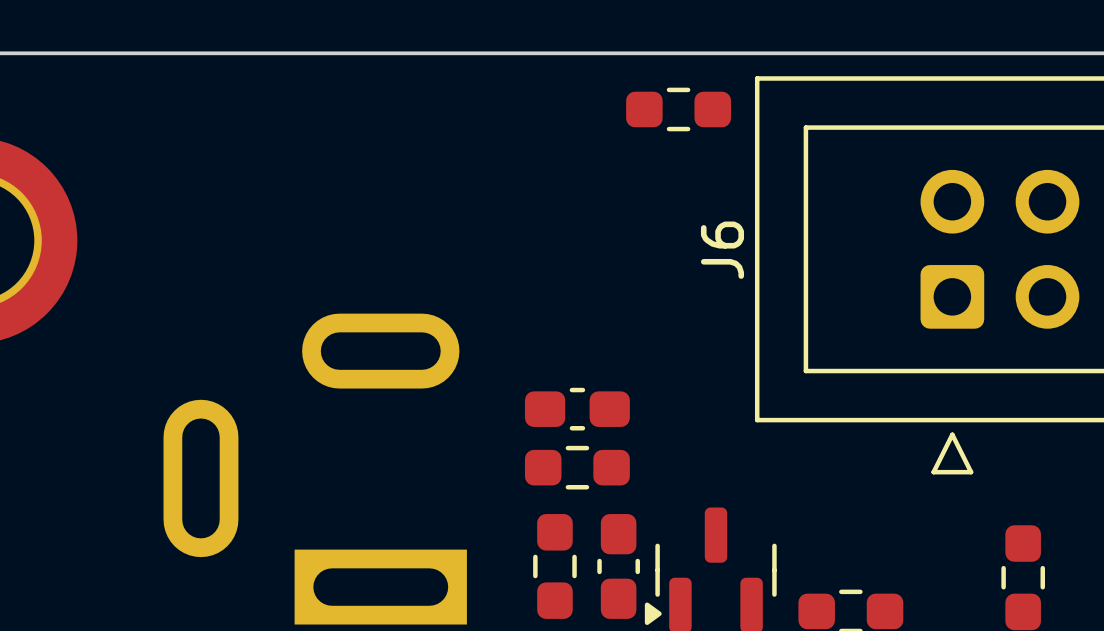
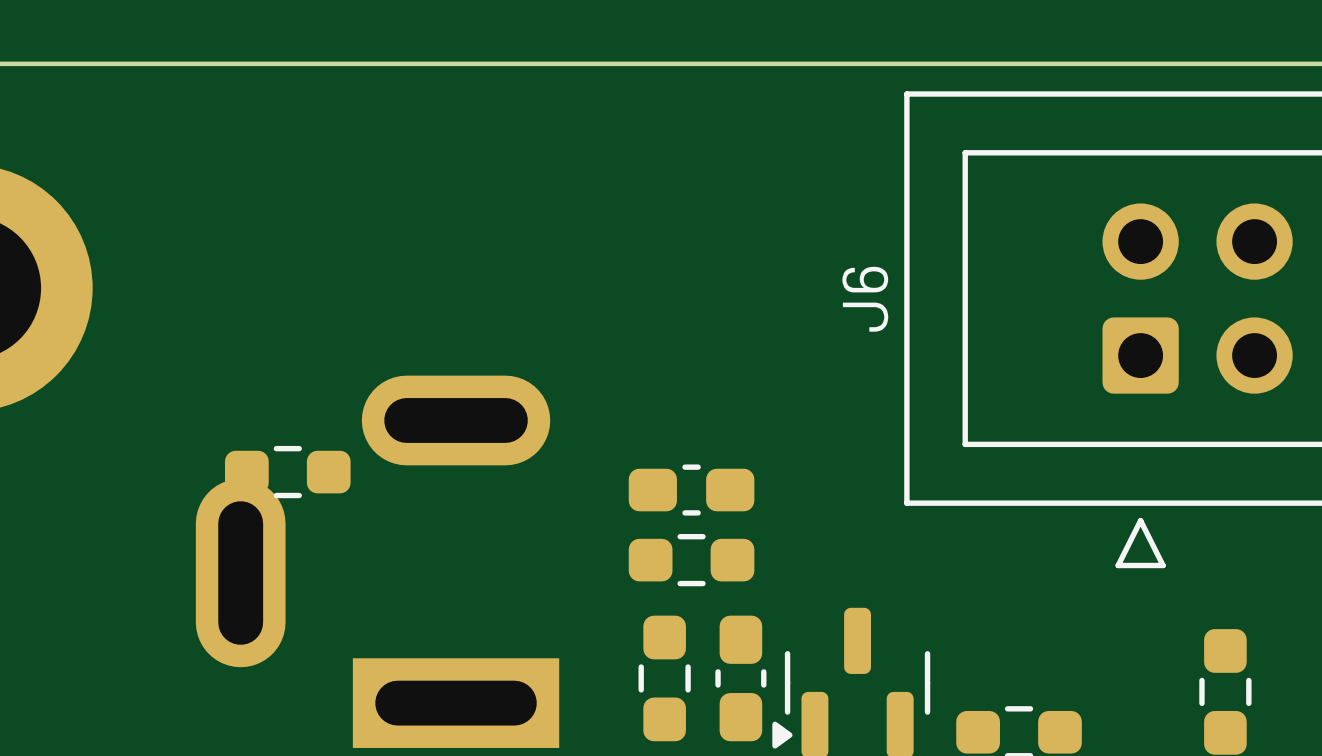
part position: (678, 109) -> (287, 472)

